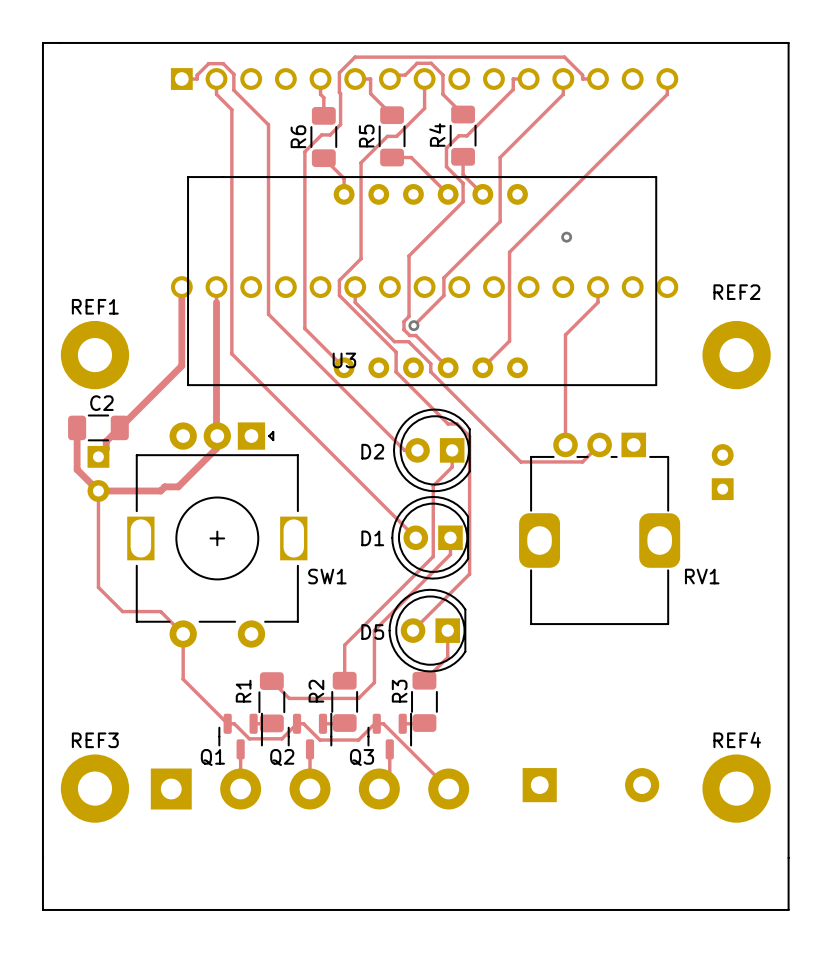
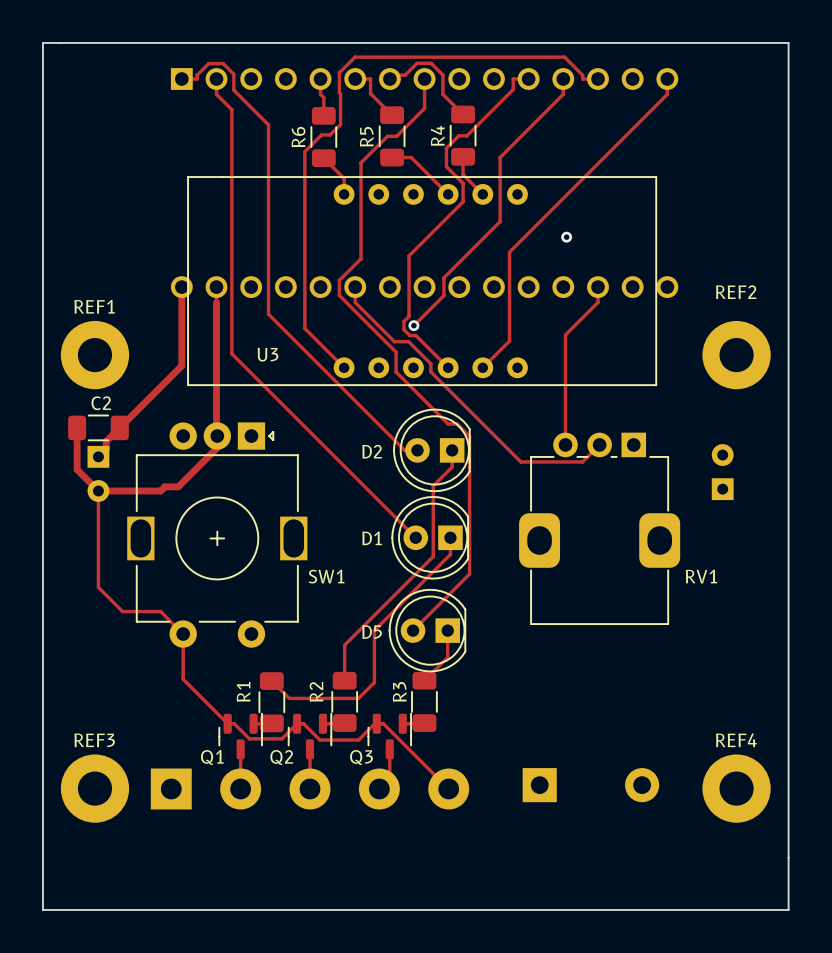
U3 name position: U3 (344, 360) -> U3 (267, 354)

